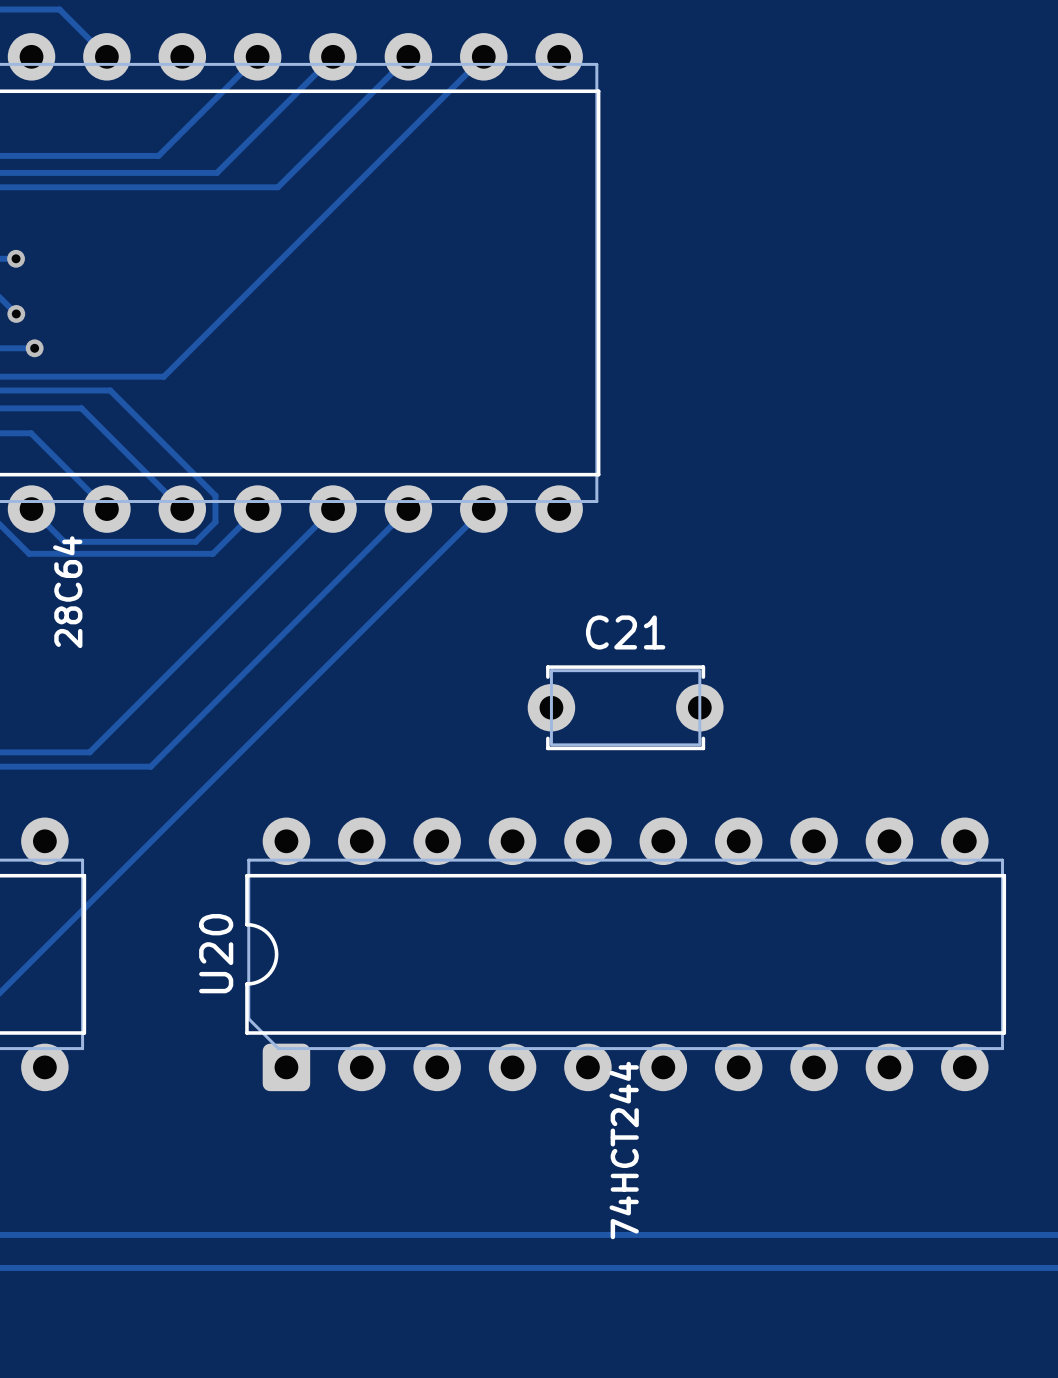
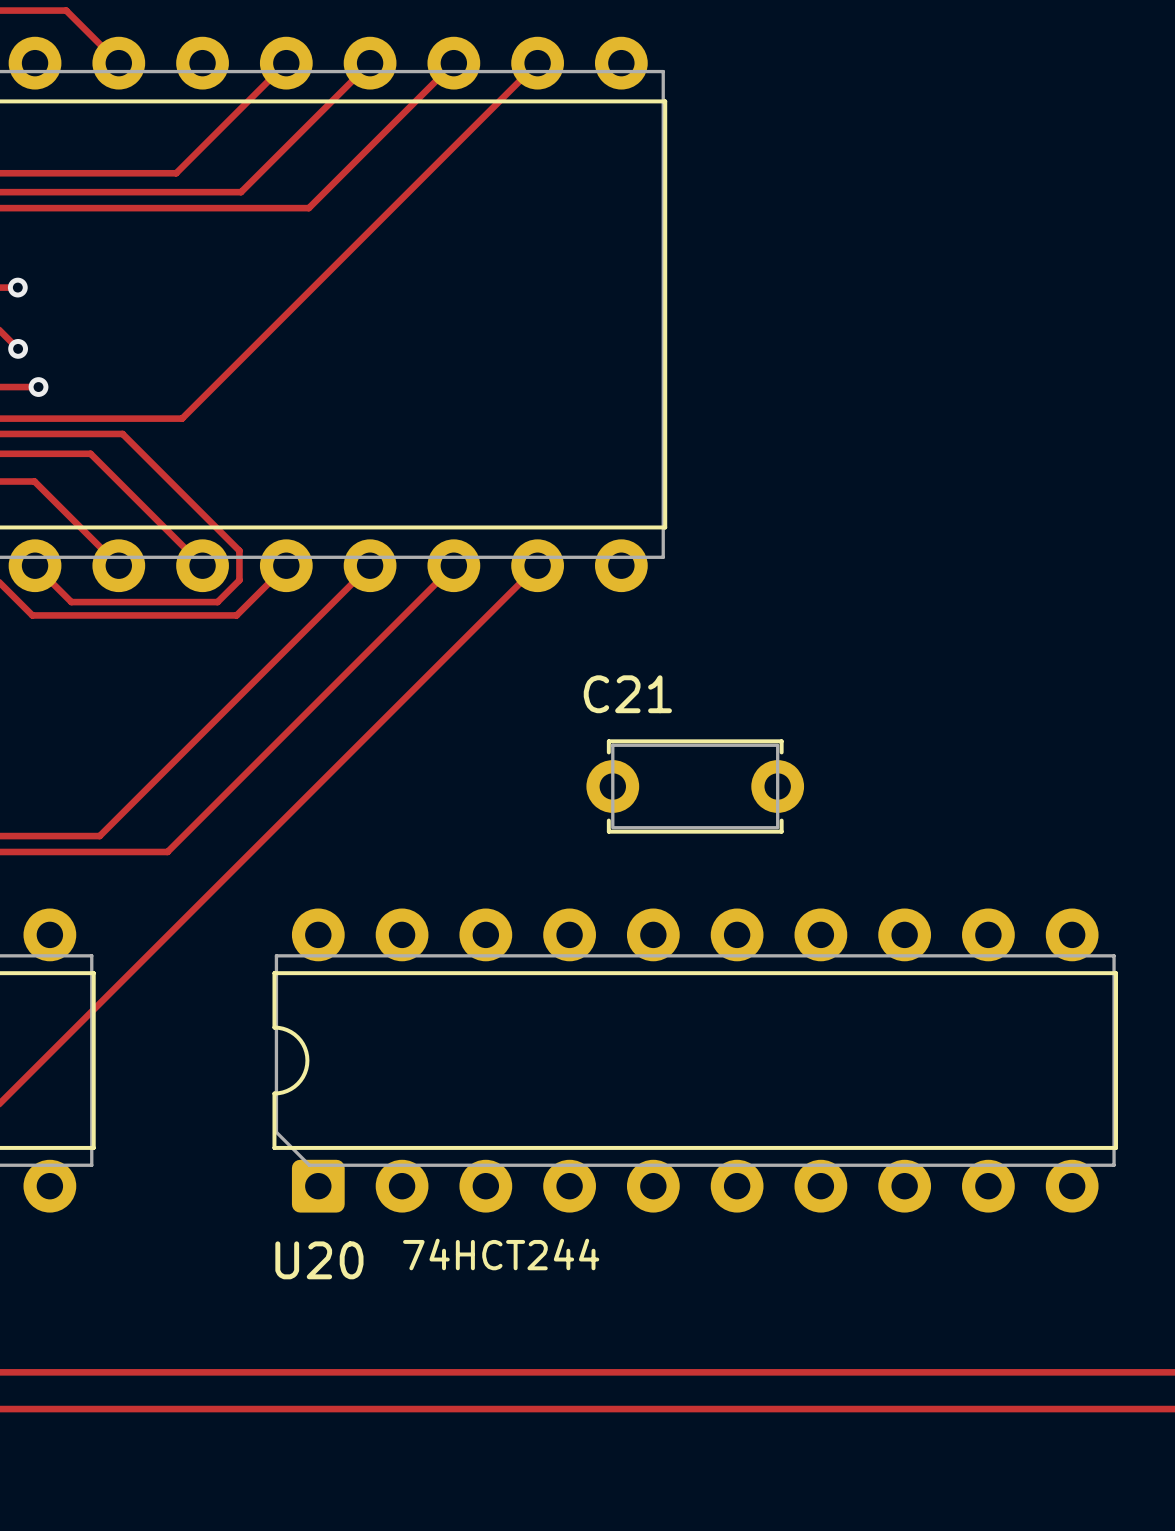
part value: 28C64 (67, 592) -> none
C21 name position: C21 (625, 632) -> C21 (627, 694)
U20 name rotation: 0° (216, 953) -> 90° clockwise (319, 1260)
U20 name position: U20 (216, 953) -> U20 (319, 1260)
text: none -> 74HCT244 (501, 1254)
U20 value: 74HCT244 (624, 1150) -> none

